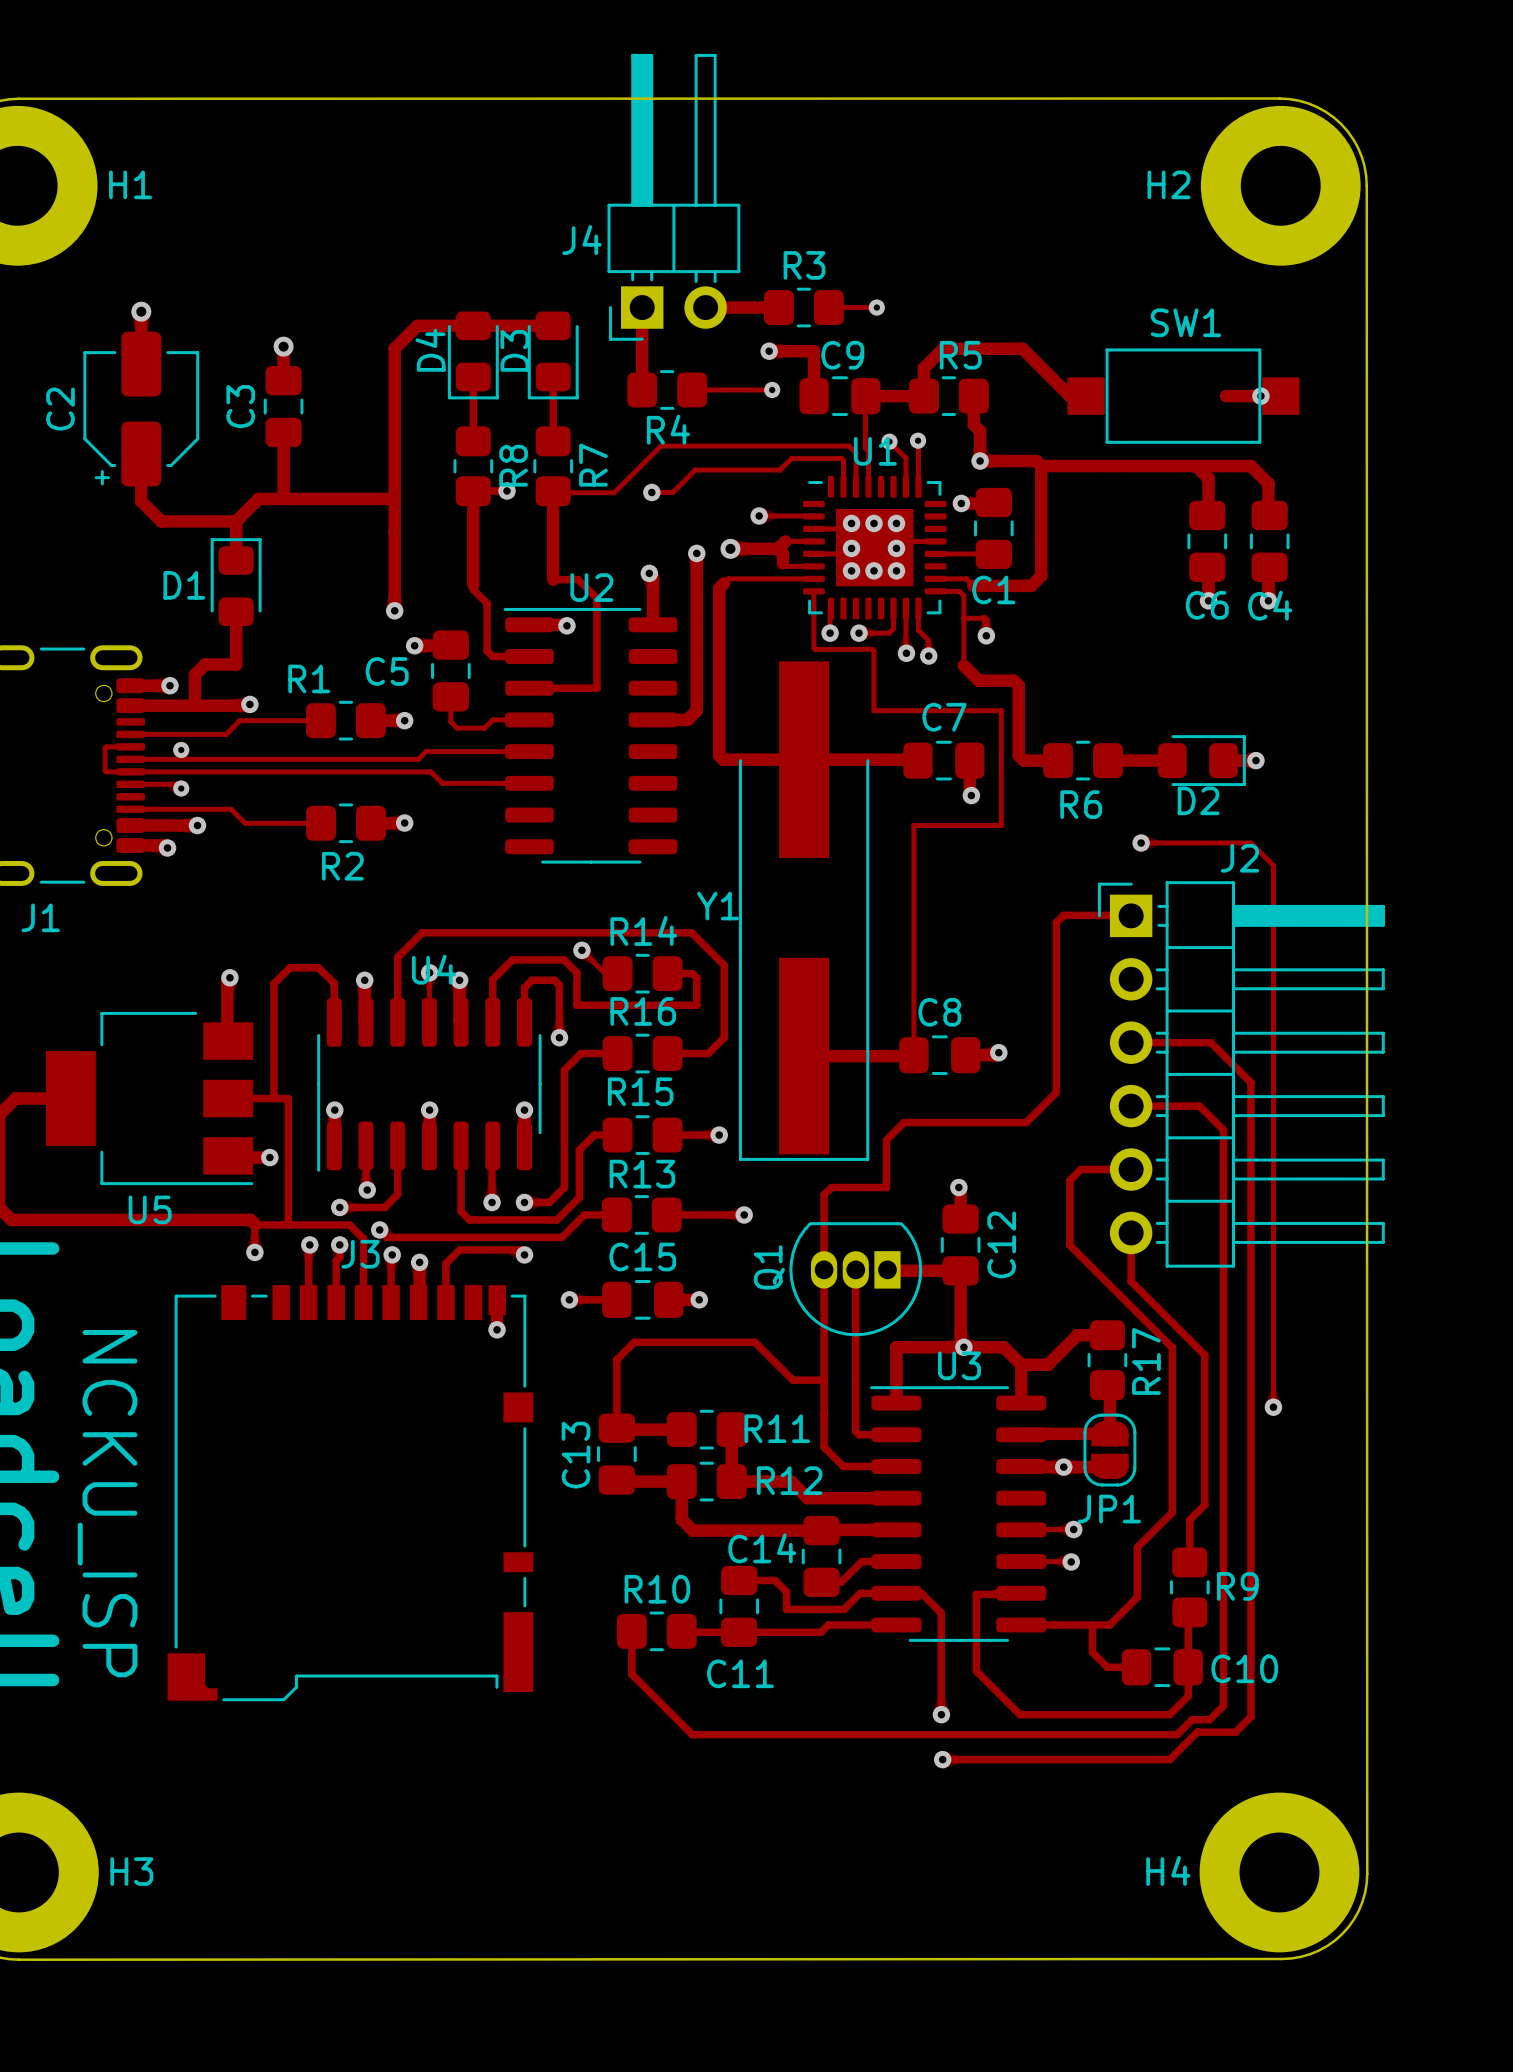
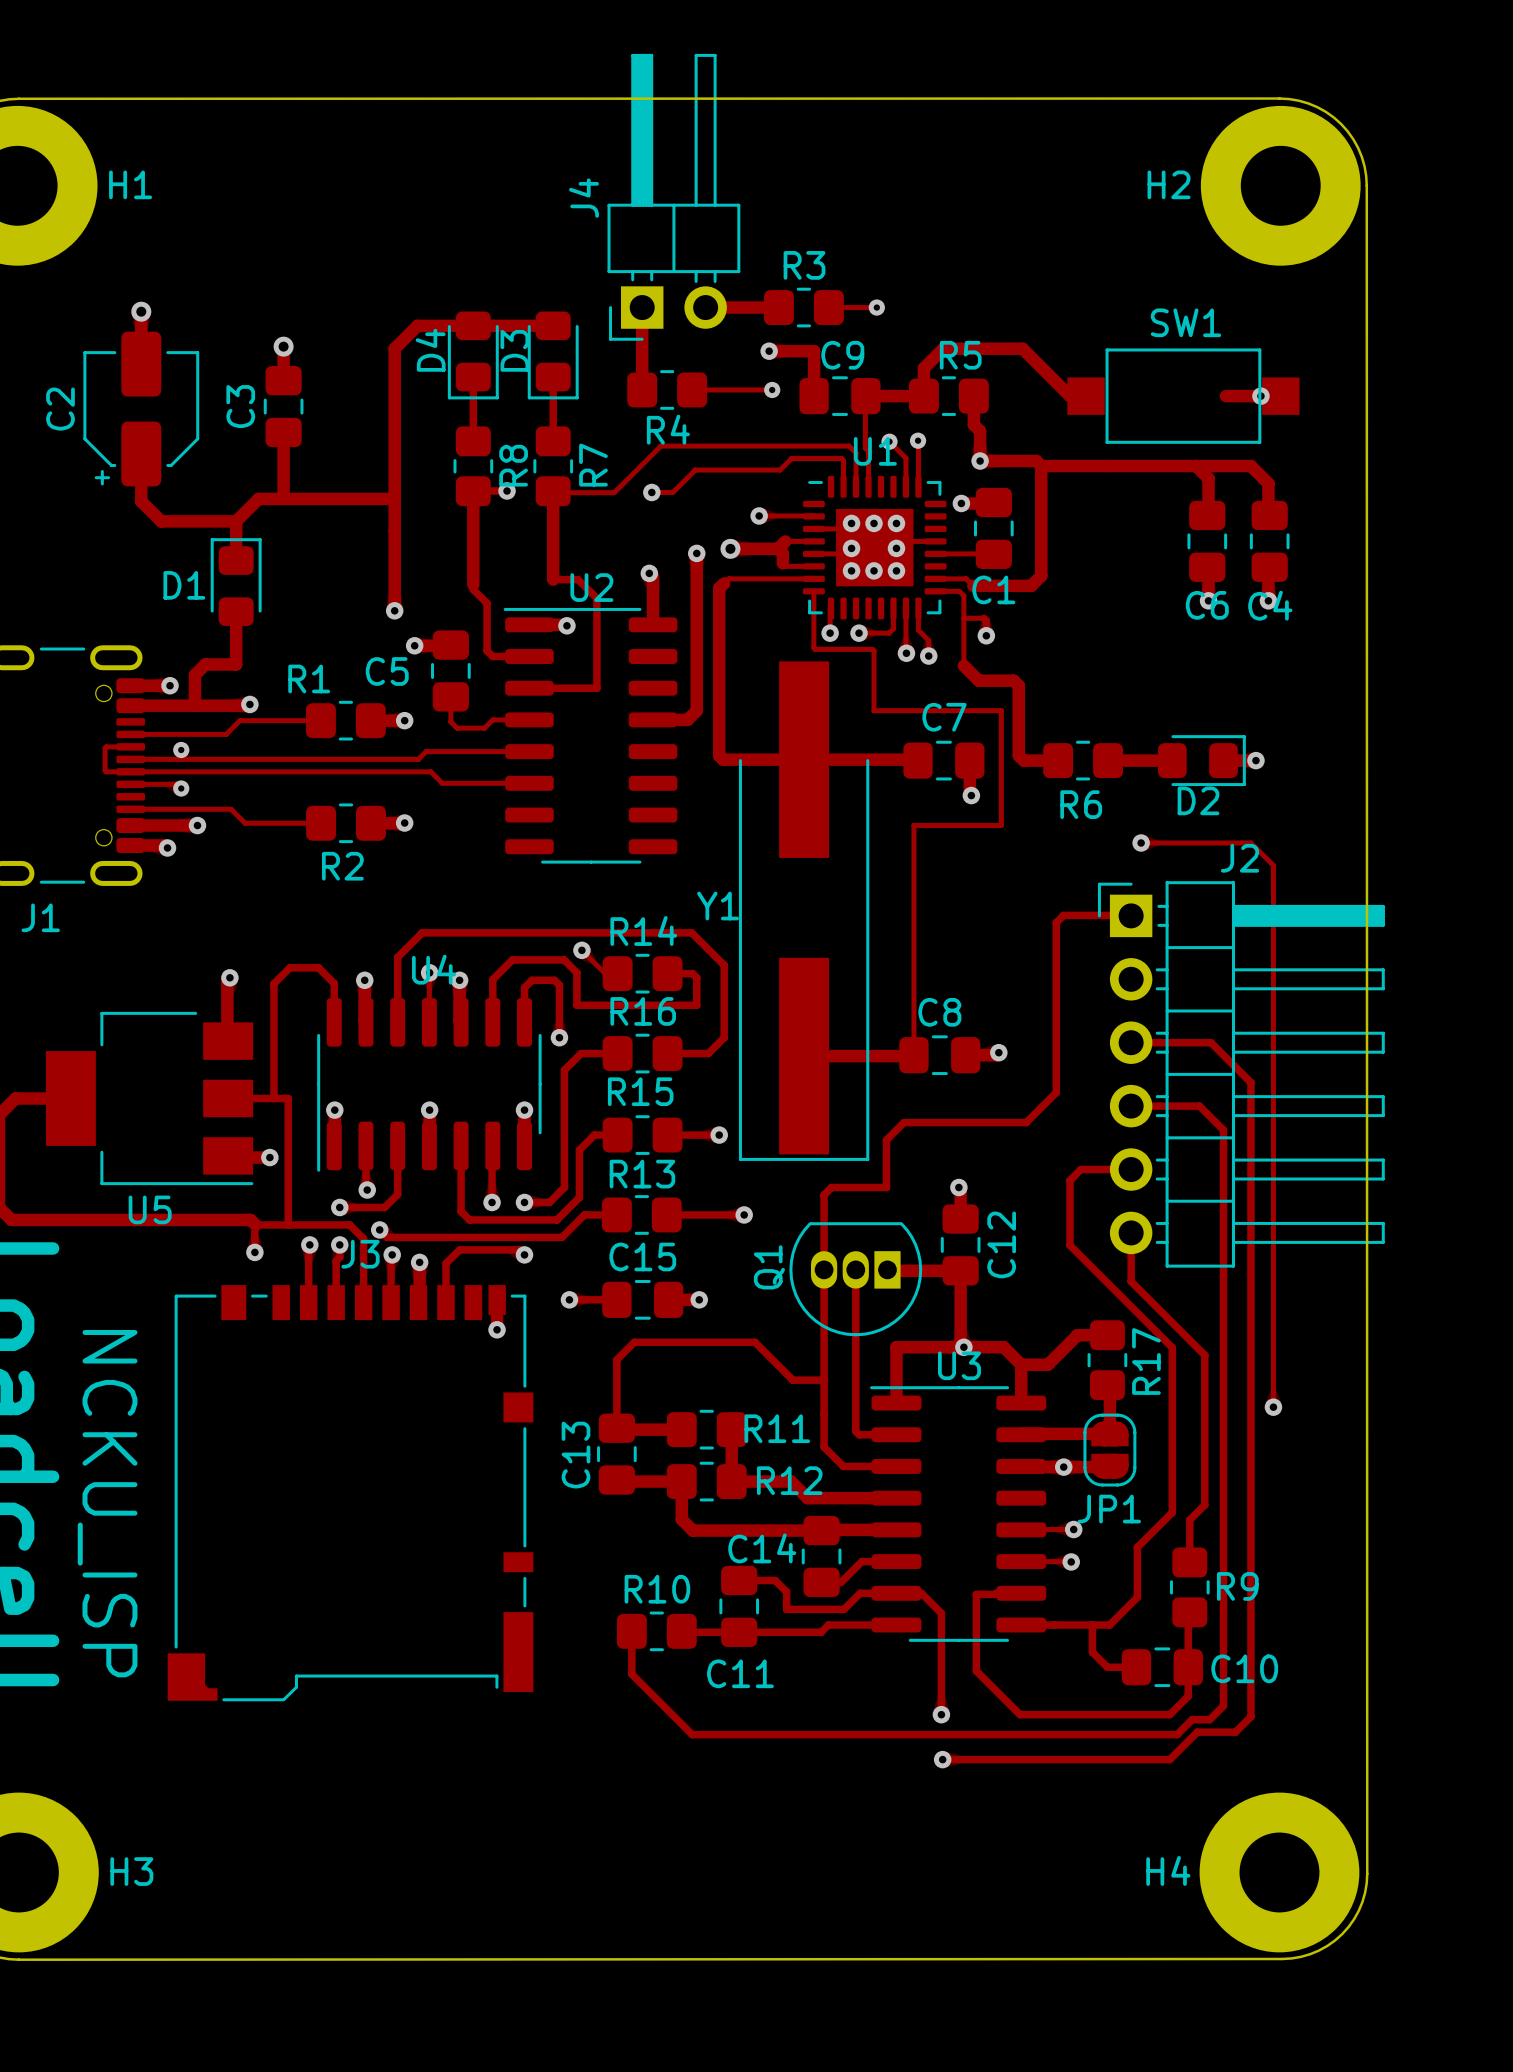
J4 name rotation: 0° (581, 240) -> 90° counterclockwise (584, 198)

